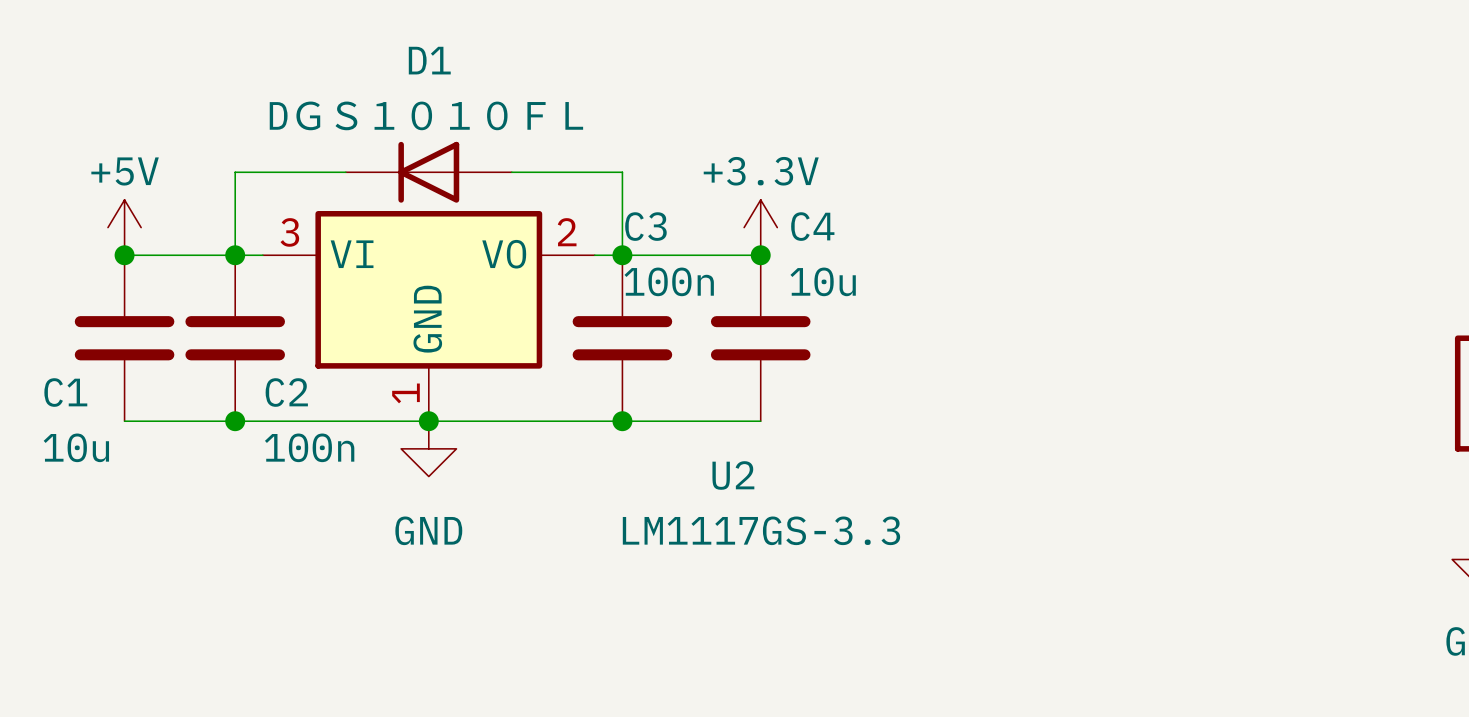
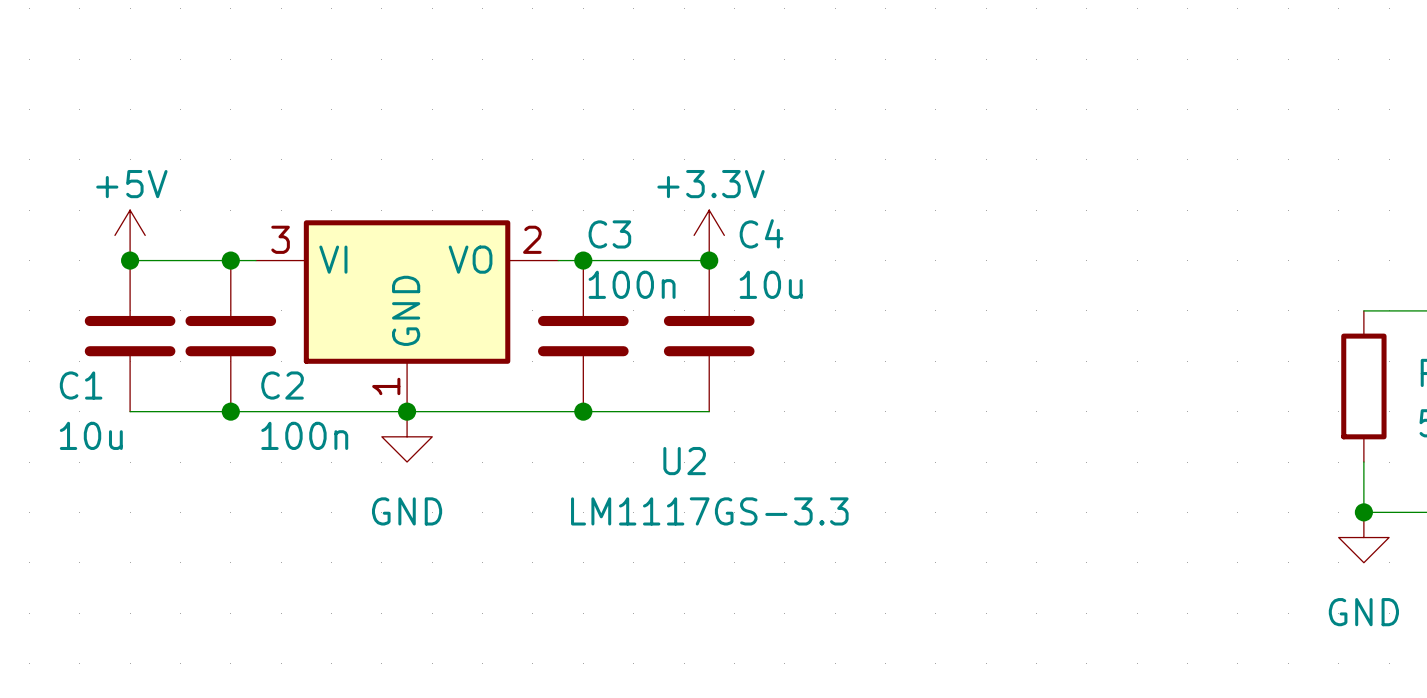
wire: (345, 172) (235, 172) (235, 255) -> none
D1: DＧＳ１０１０ＦＬ (428, 172) -> none
wire: (511, 172) (622, 172) (622, 255) -> none

